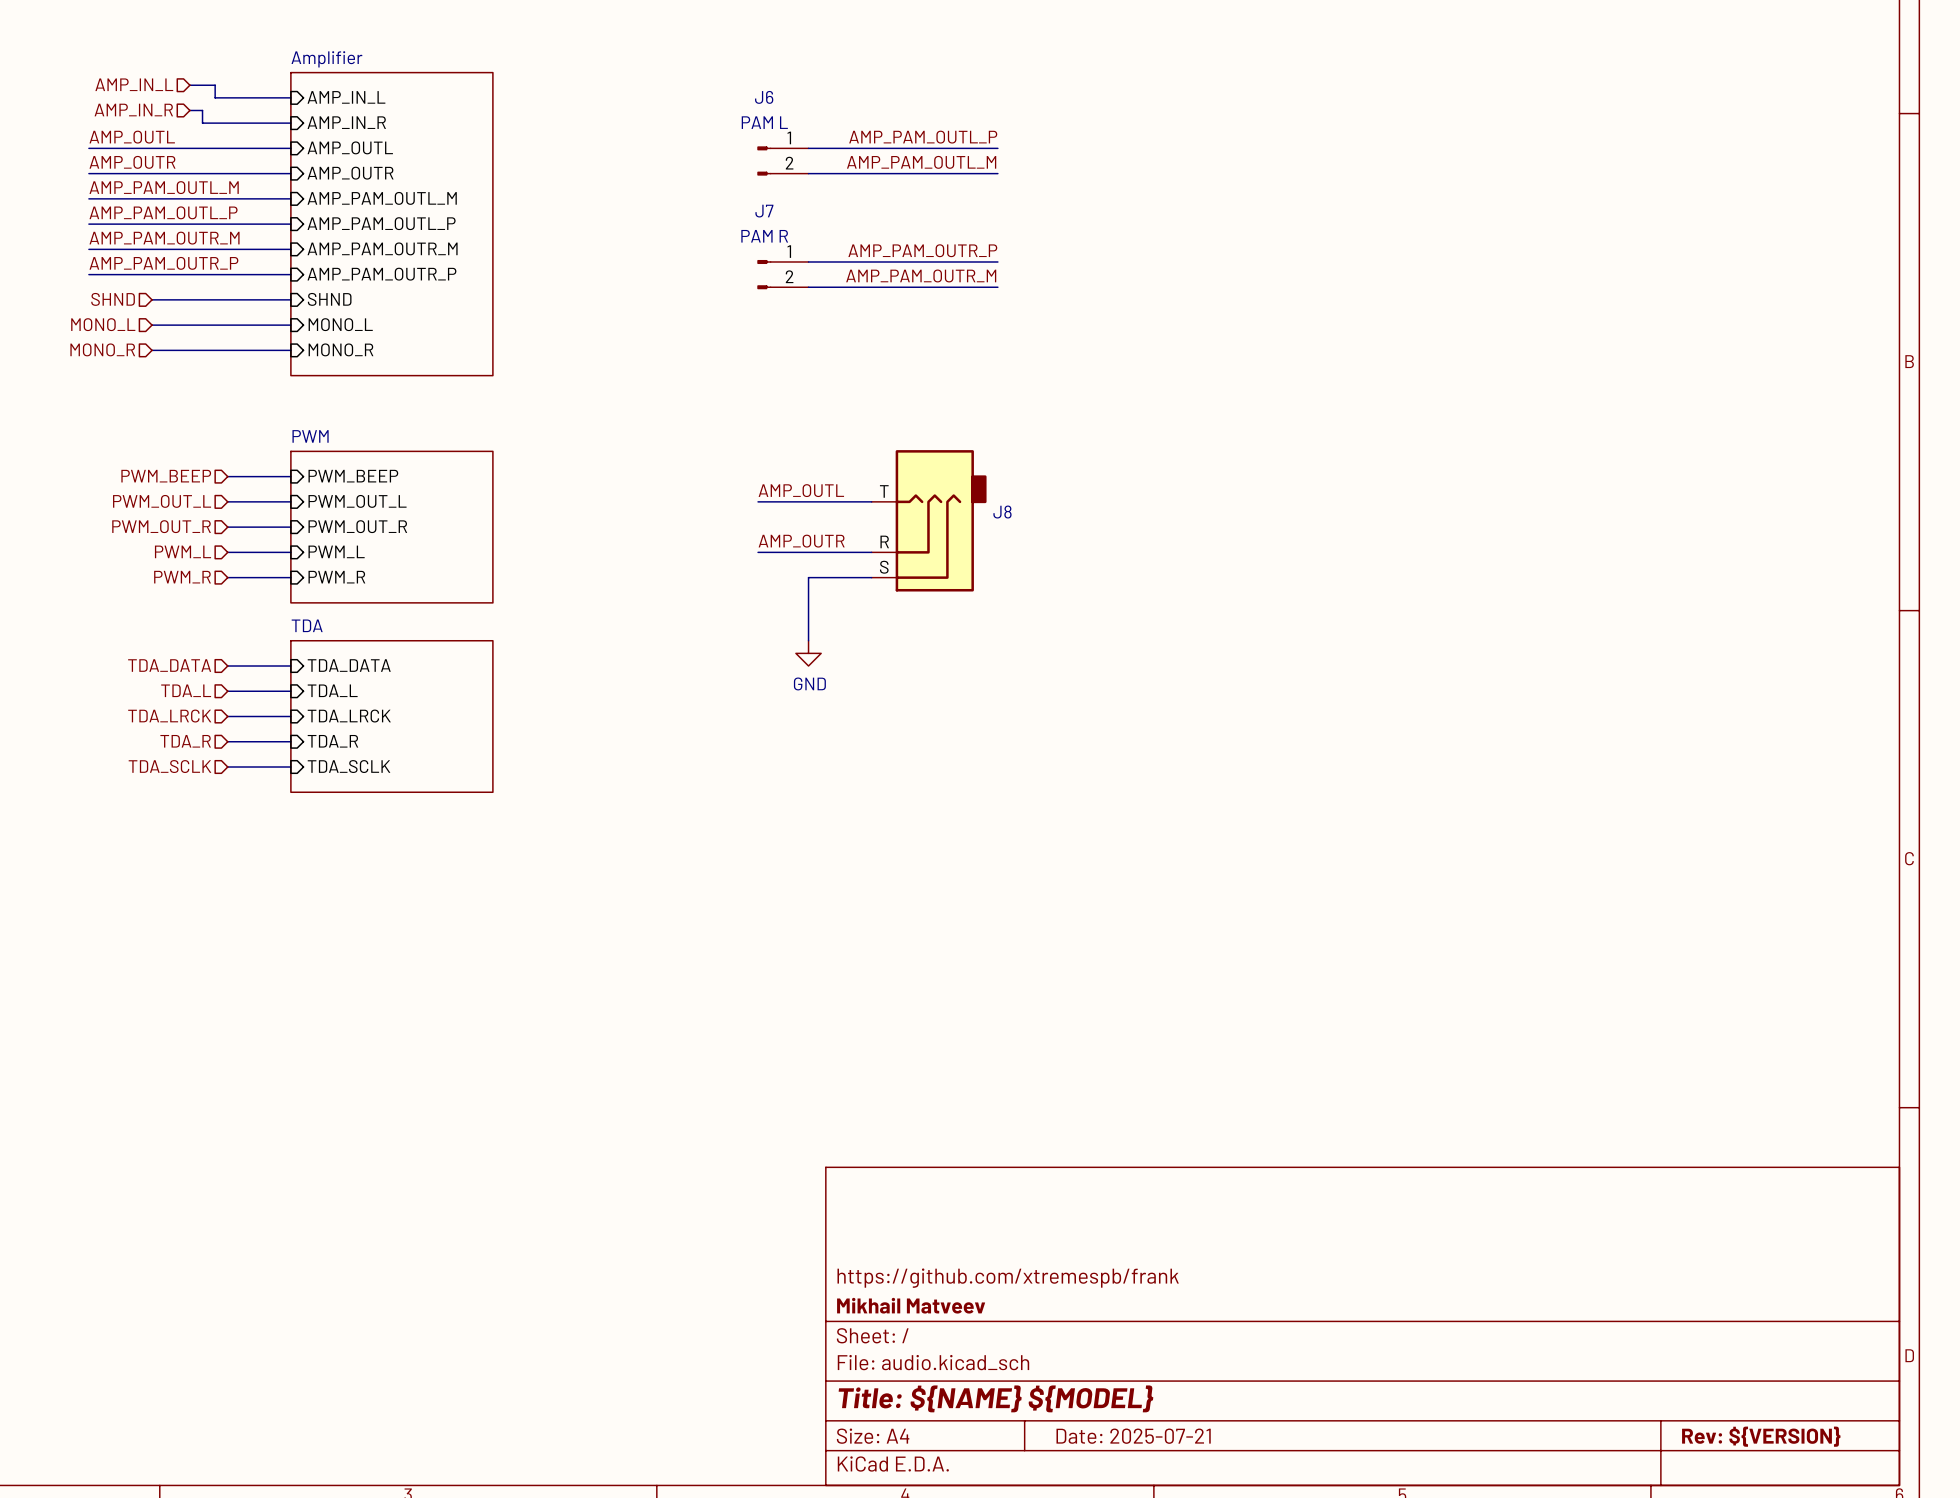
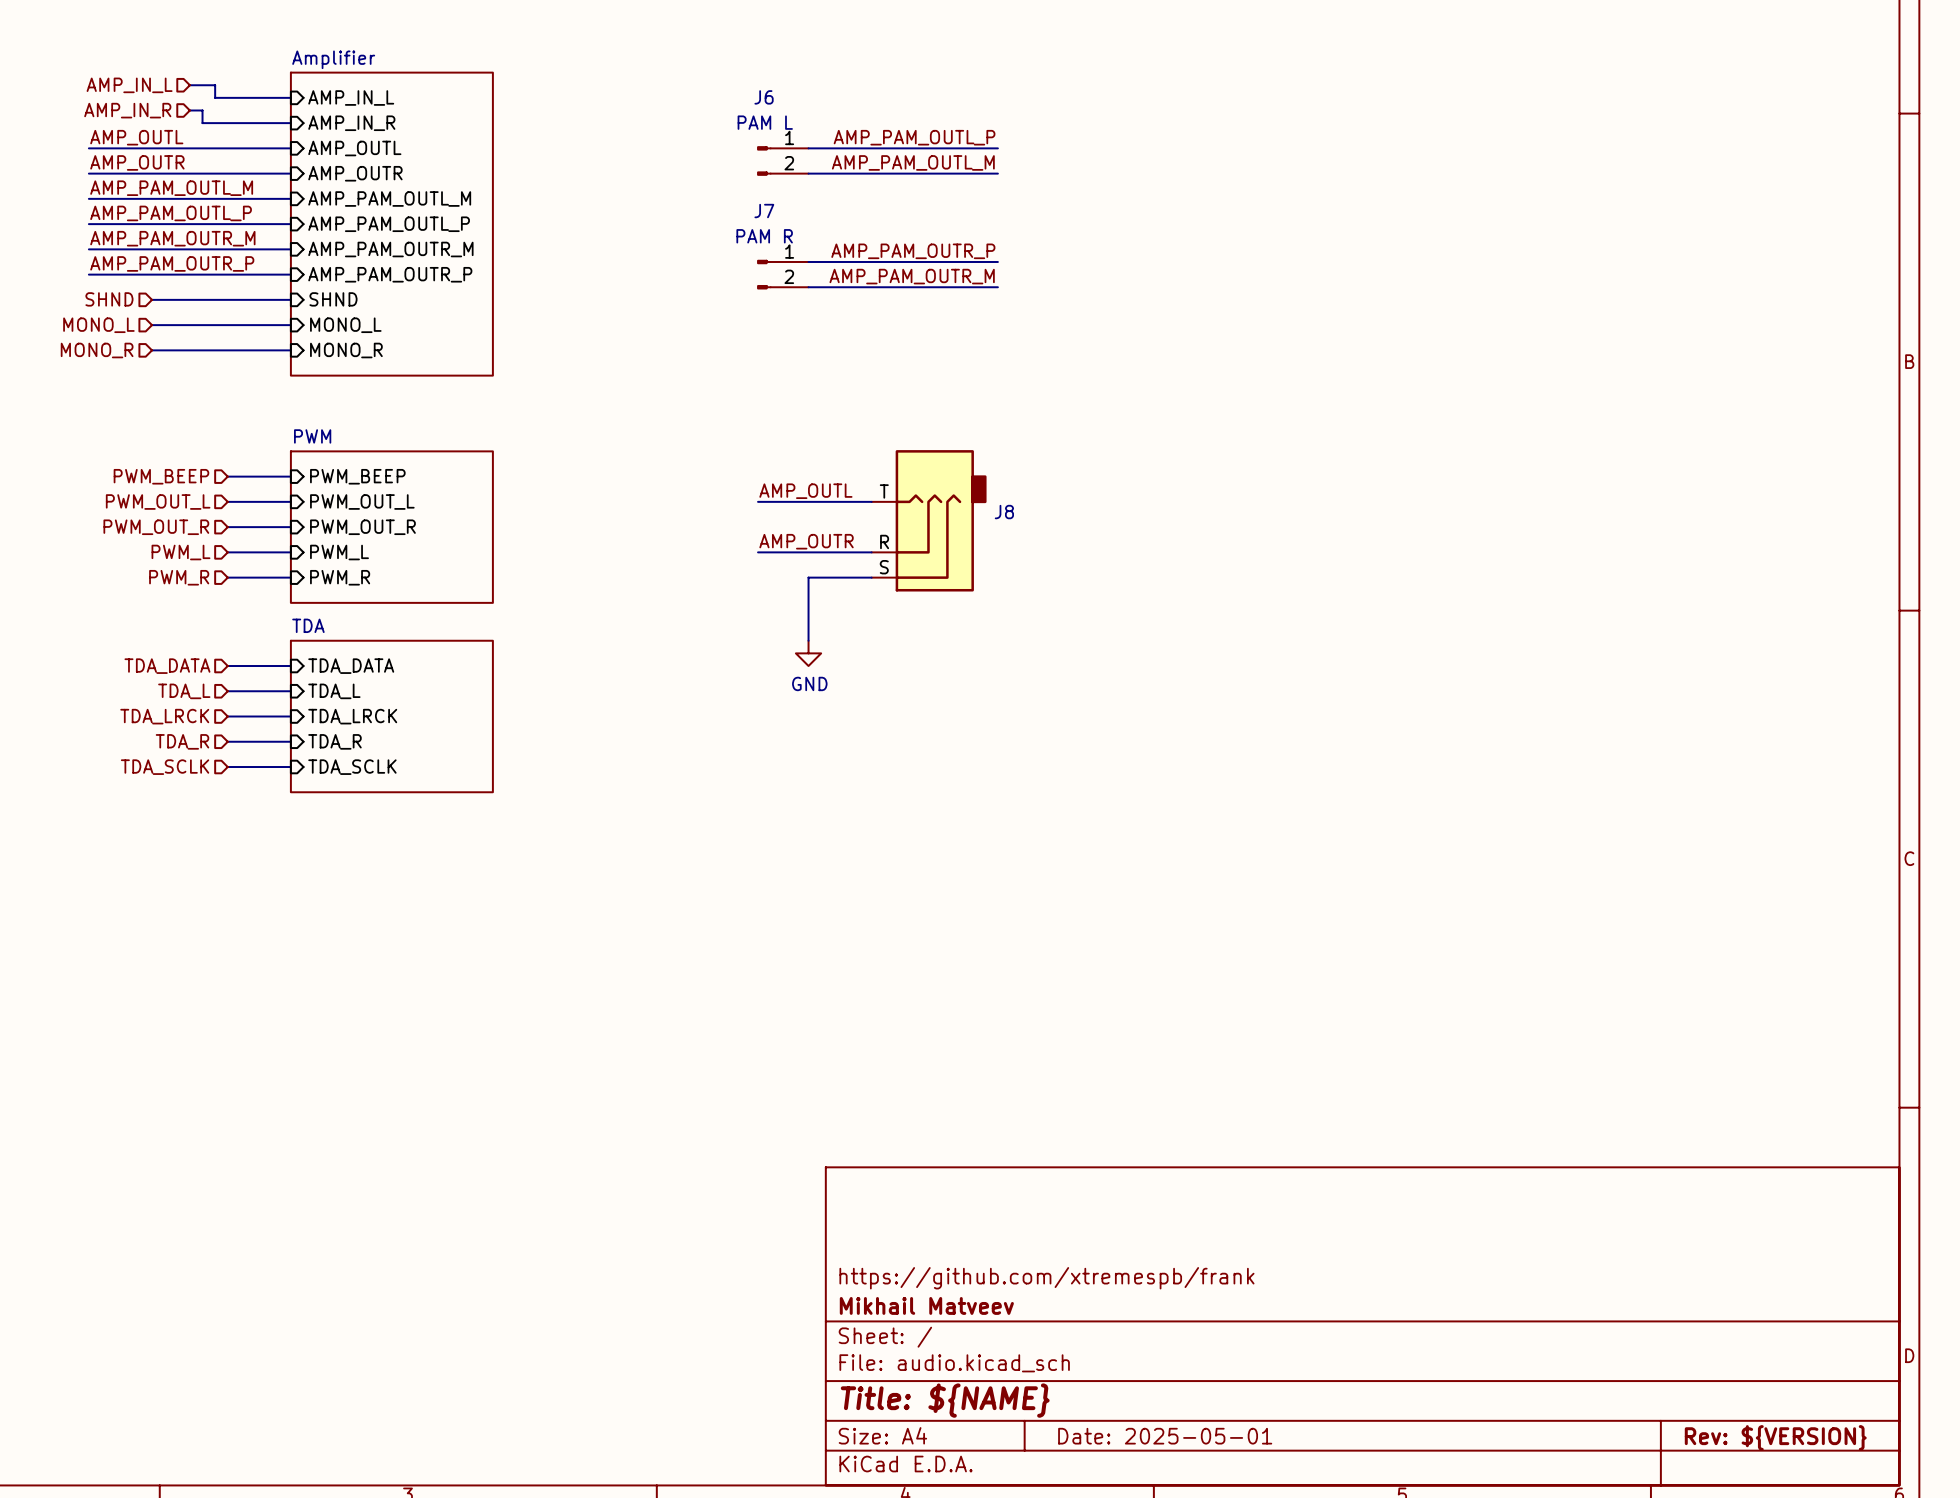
title block: Title: ${NAME} ${MODEL} (995, 1398) -> Title: ${NAME} (945, 1400)
title block: Date: 2025-07-21 (1133, 1436) -> Date: 2025-05-01 (1165, 1436)

